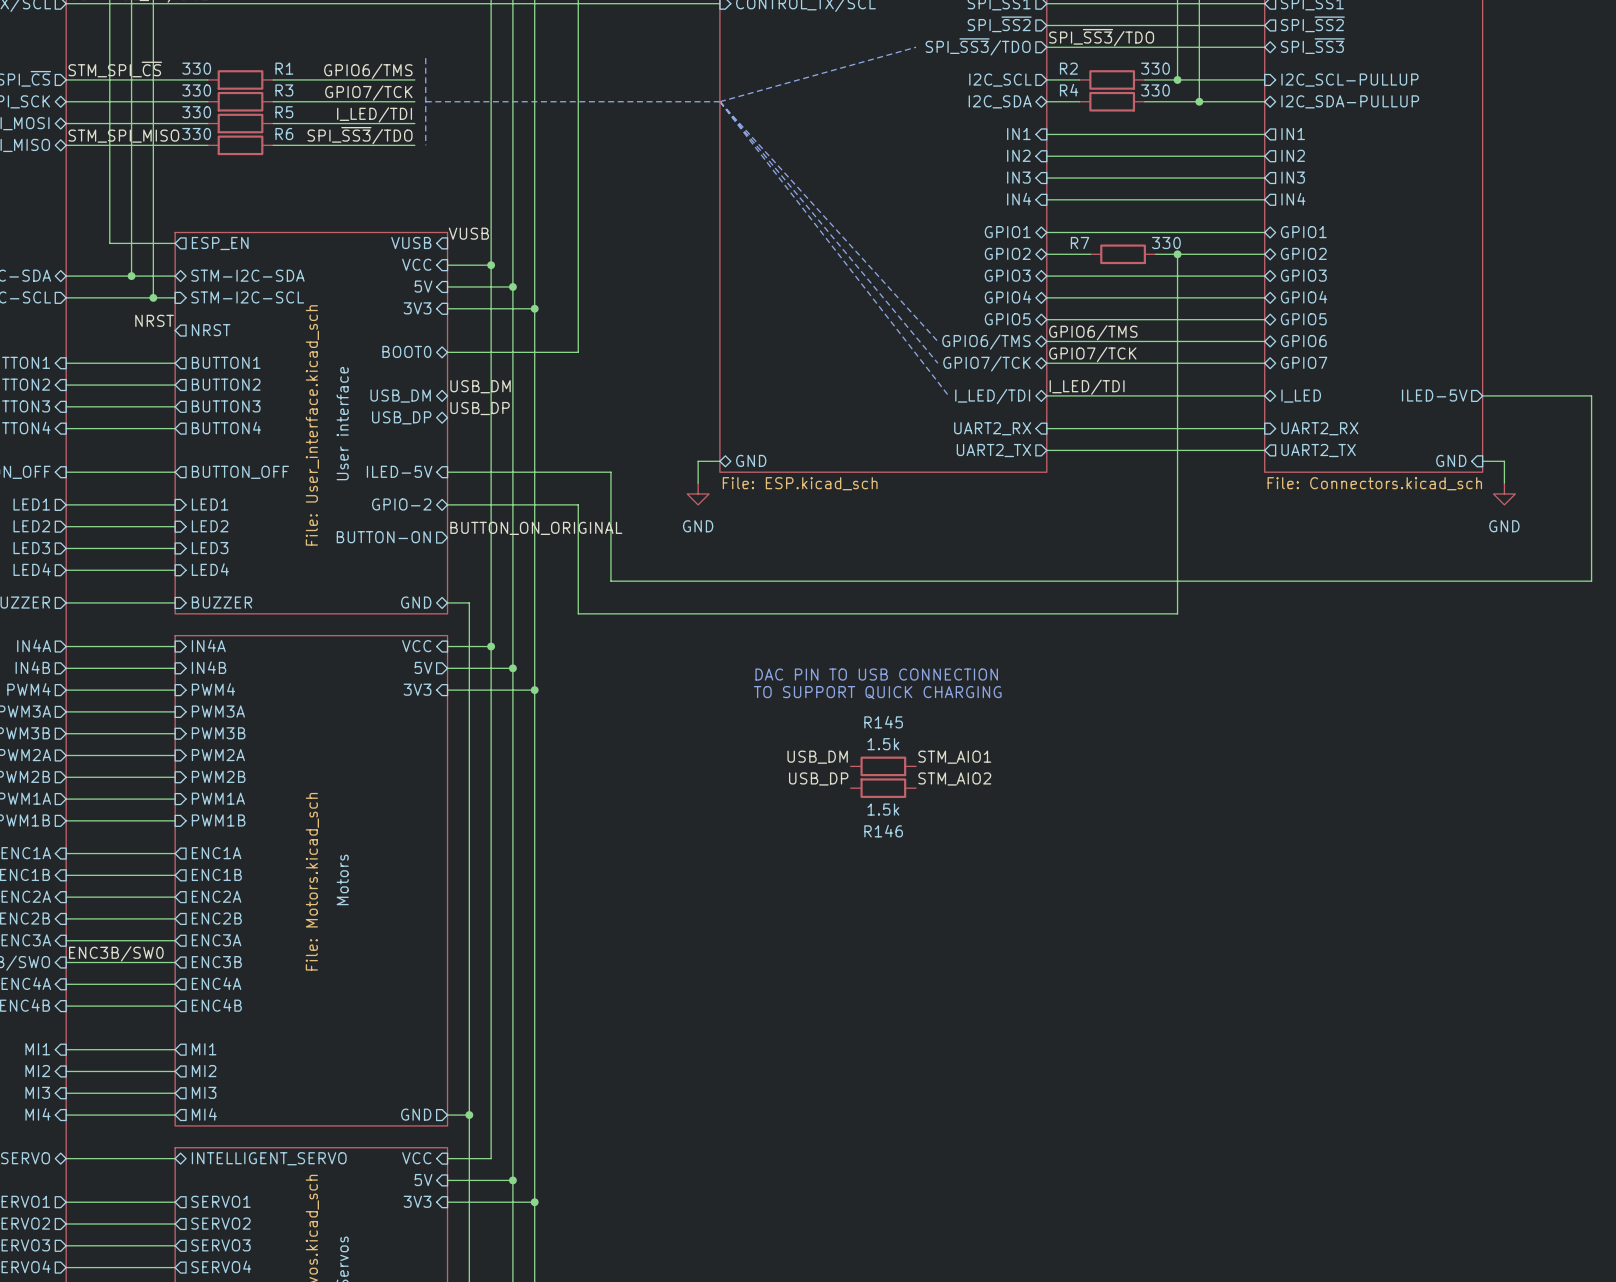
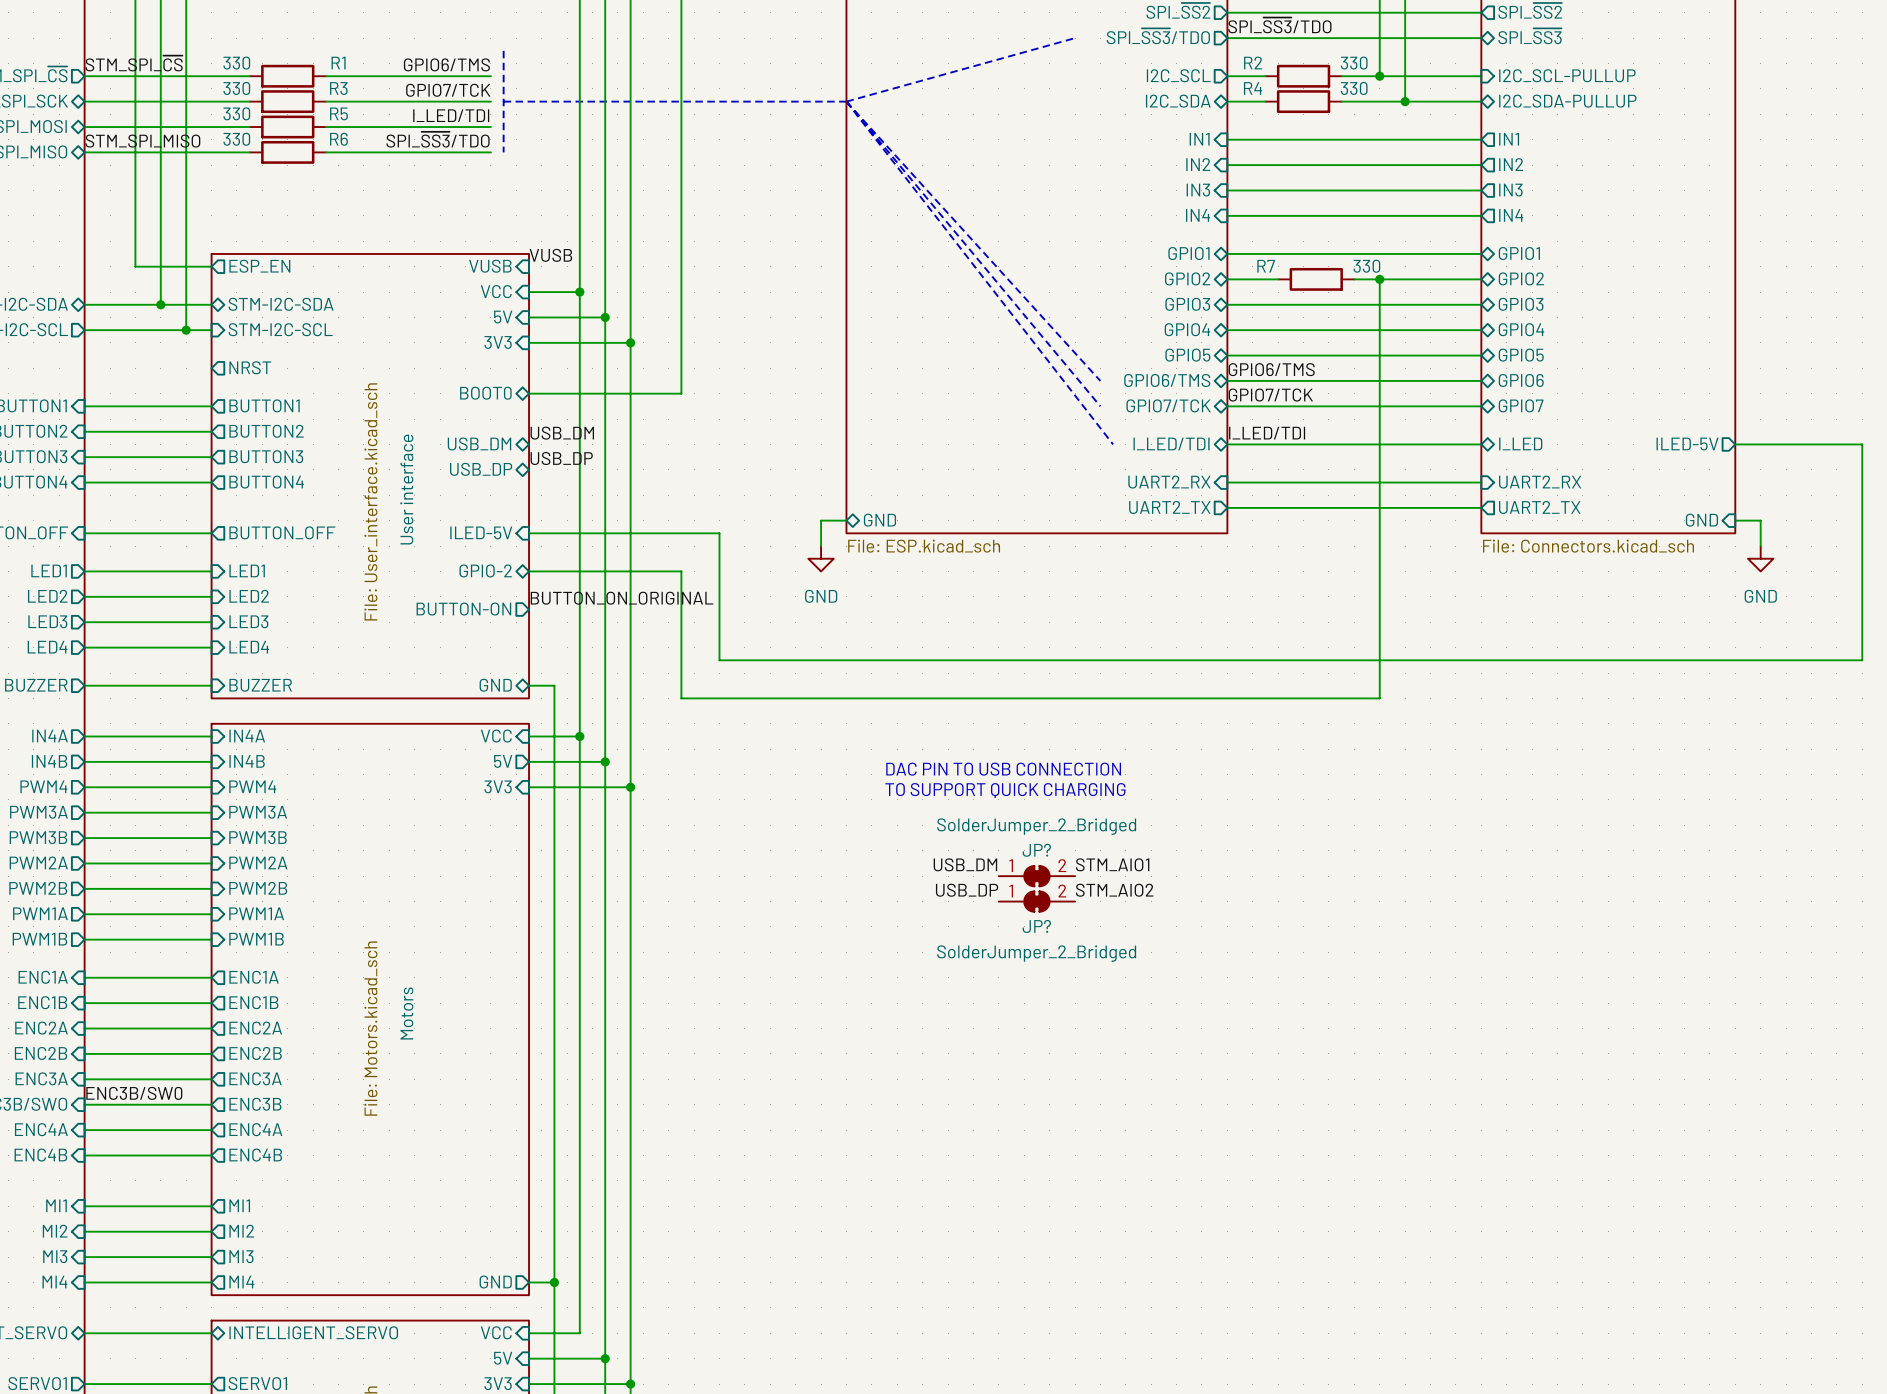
label: NRST (154, 320) -> none
R145: 1.5k (883, 766) -> none
JP?: none -> SolderJumper_2_Bridged (1036, 876)
R146: 1.5k (883, 788) -> none
JP?: none -> SolderJumper_2_Bridged (1036, 901)

